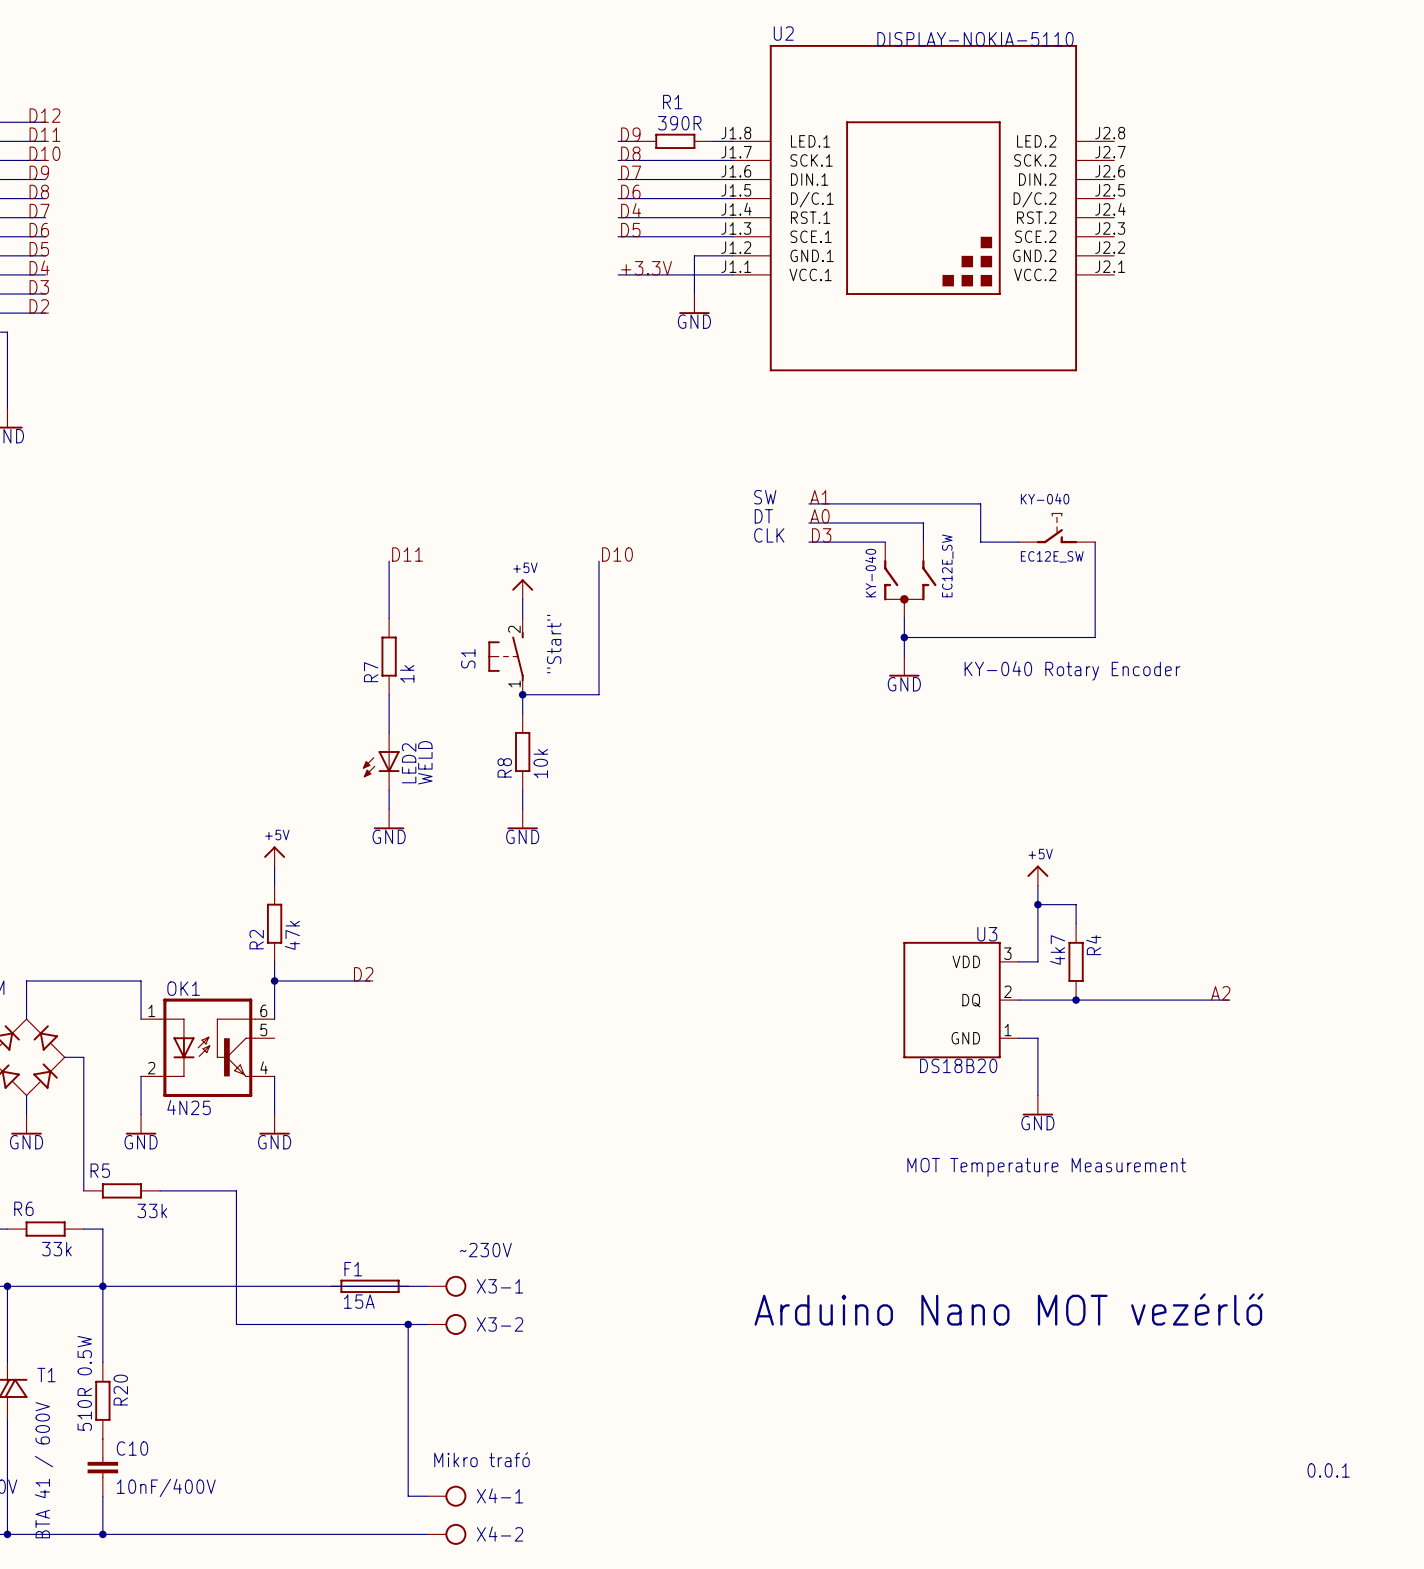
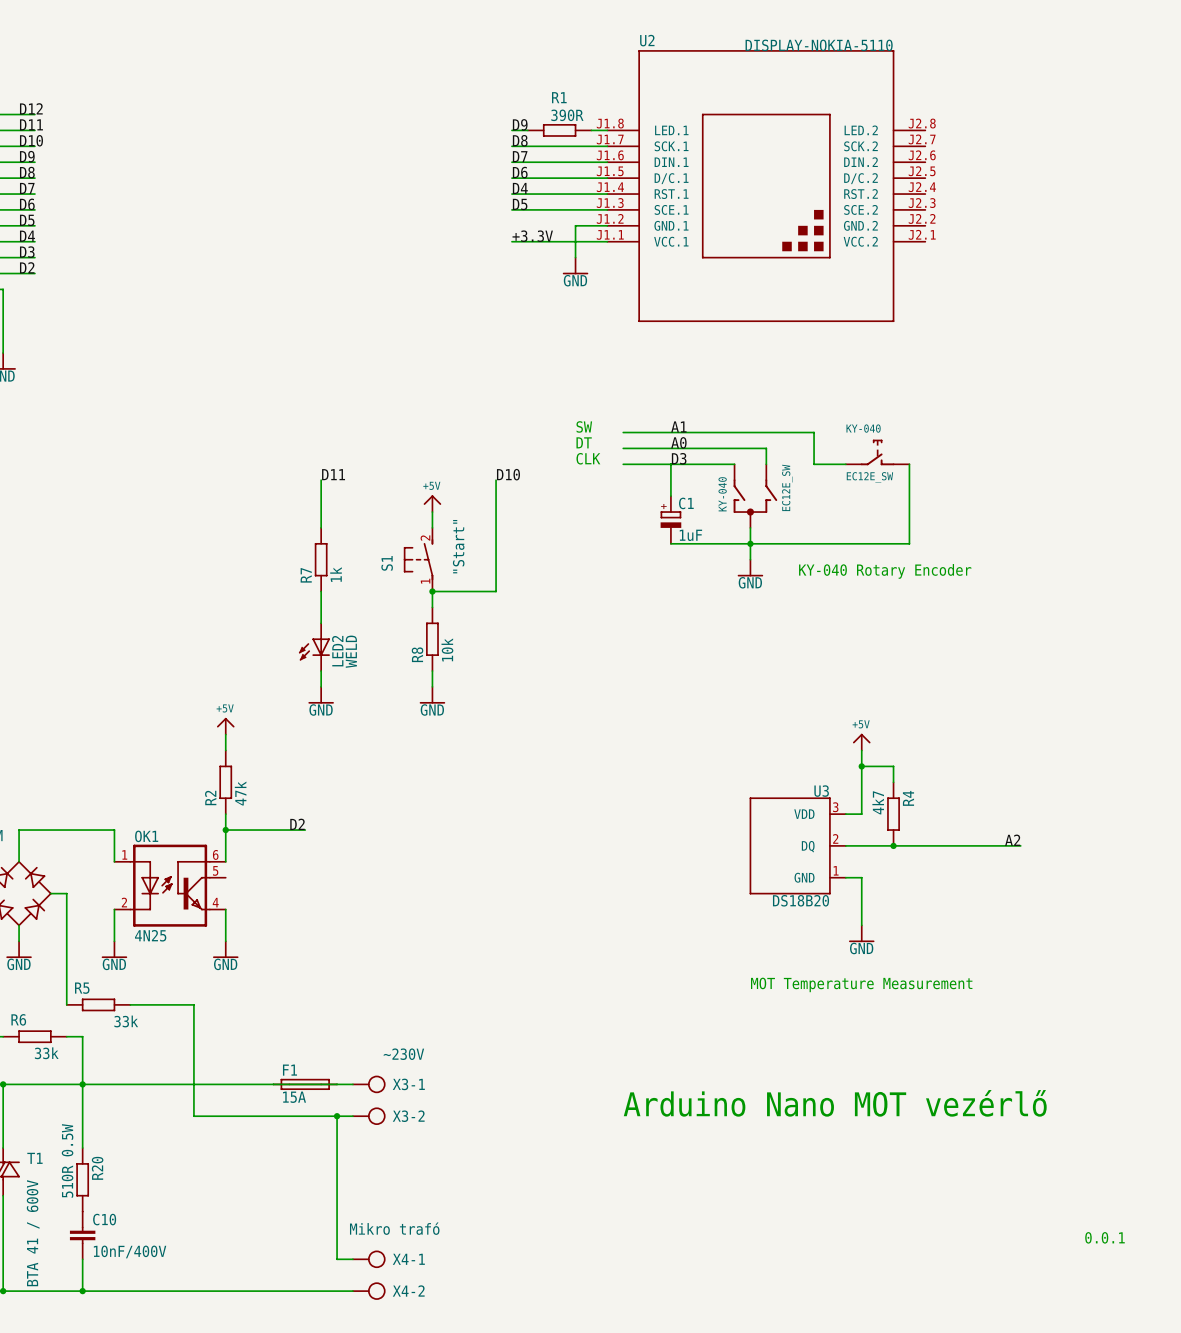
text position: SW (765, 497) -> SW (584, 426)
wire: none -> (623, 432) (670, 432)
text position: DT (763, 516) -> DT (584, 442)
wire: none -> (623, 448) (670, 448)
text position: CLK (769, 535) -> CLK (588, 458)
wire: none -> (623, 464) (670, 464) (670, 496)
C1: none -> 1uF (670, 519)
wire: none -> (670, 543) (750, 543)

